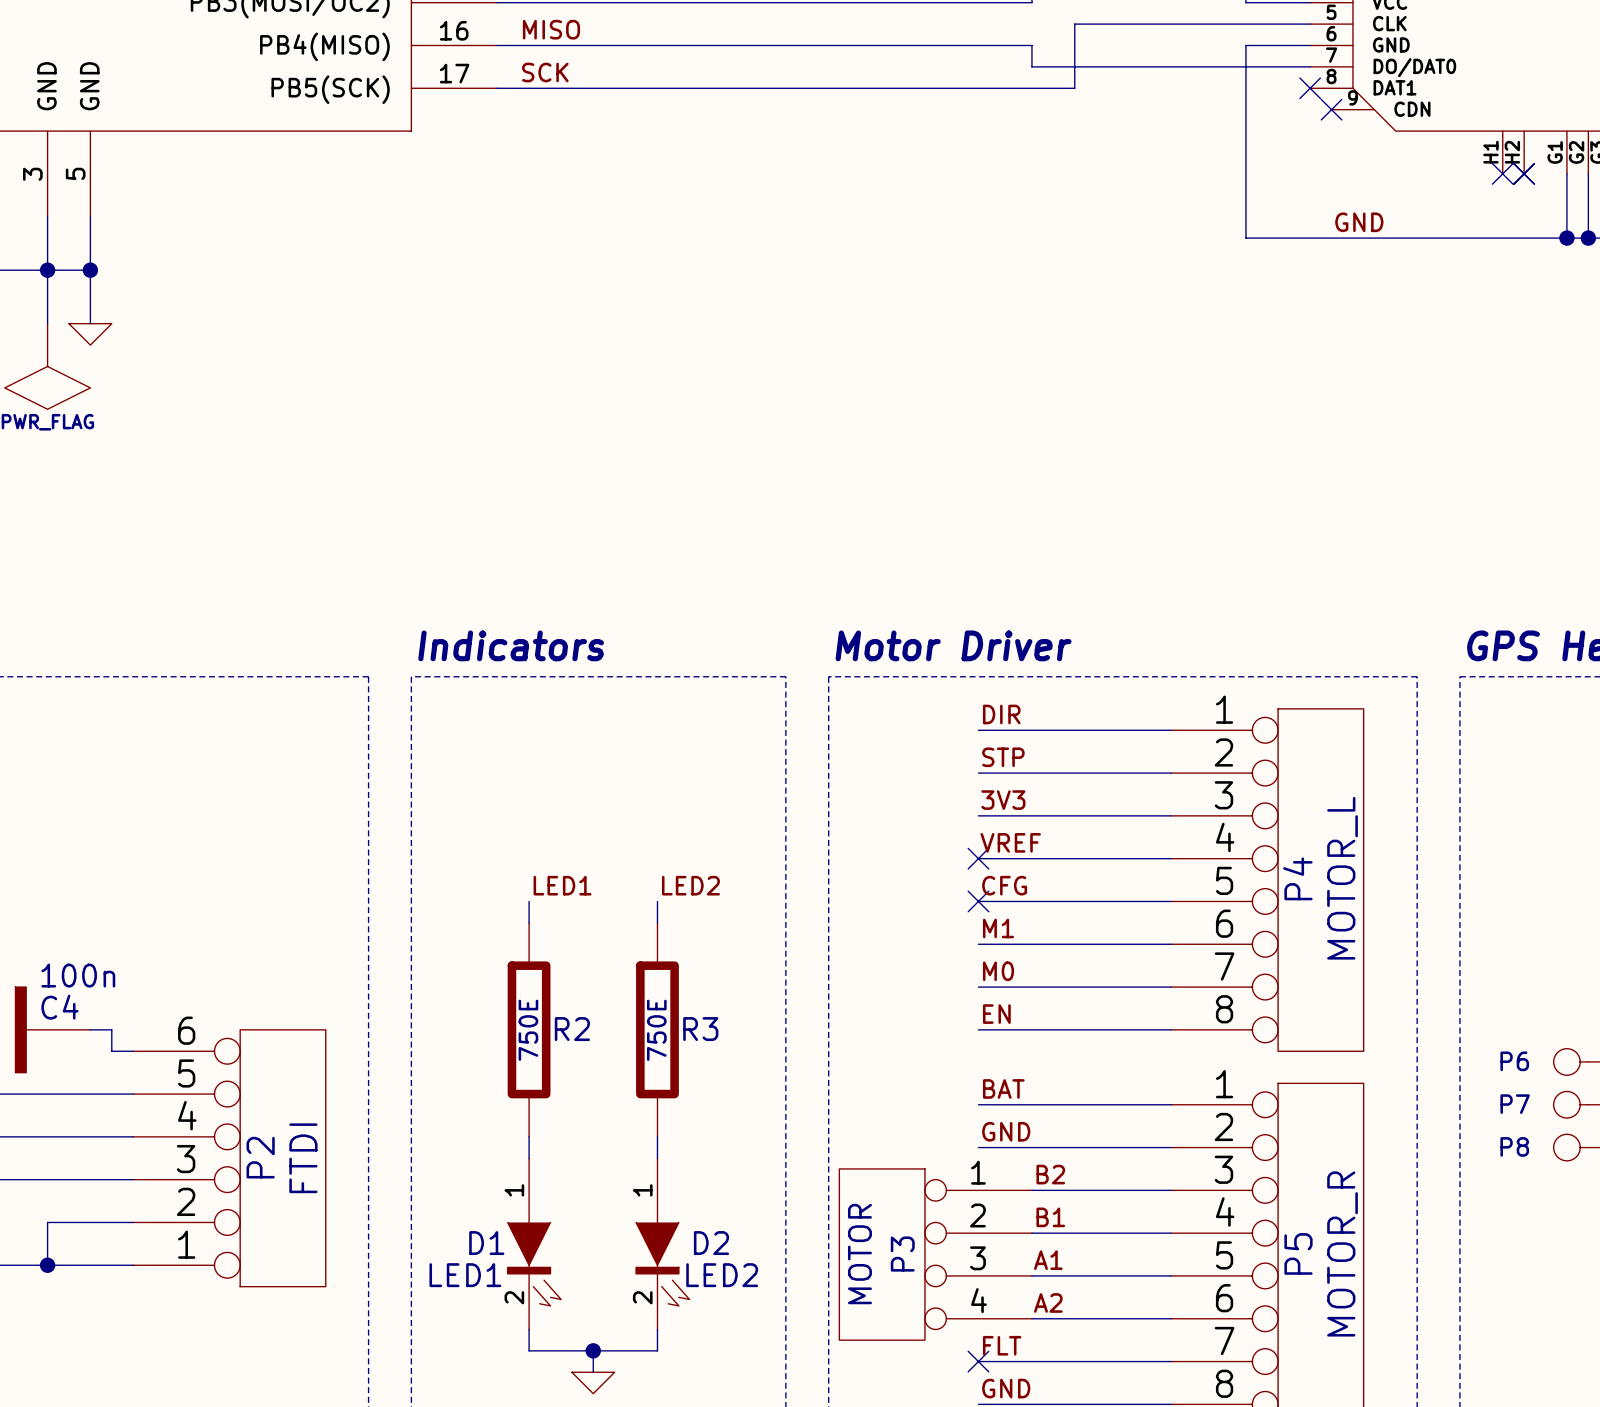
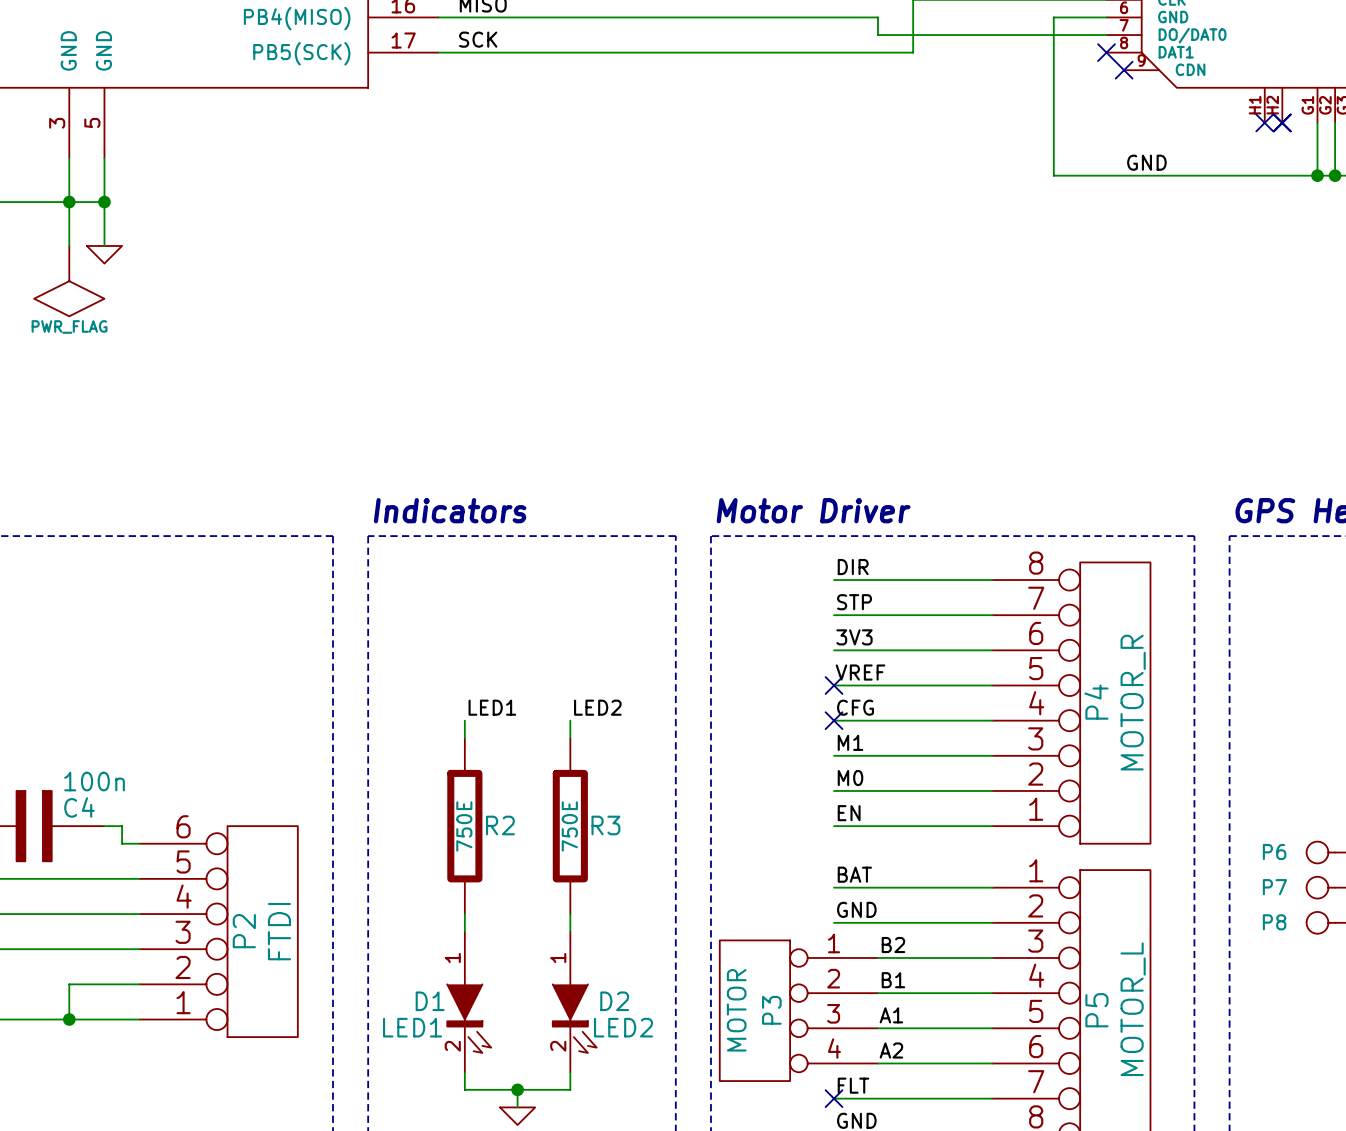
P4 value: MOTOR_L (1342, 878) -> MOTOR_R (1133, 702)
P4 flip: as is (1320, 880) -> up-down (1115, 703)
P5 value: MOTOR_R (1342, 1253) -> MOTOR_L (1133, 1009)

